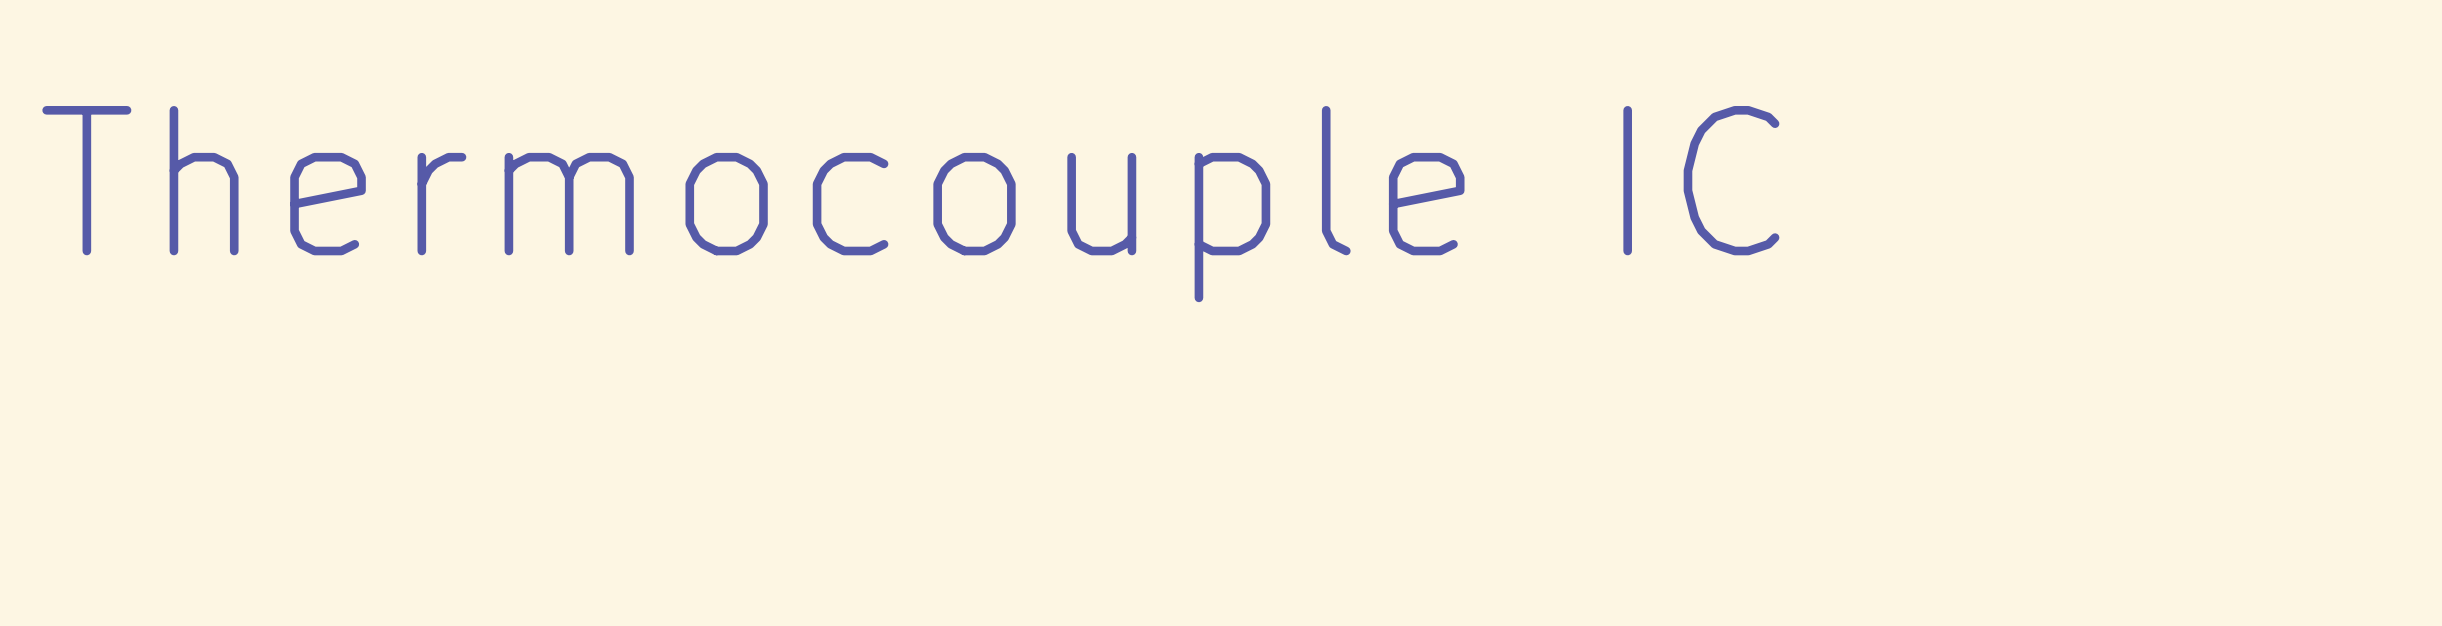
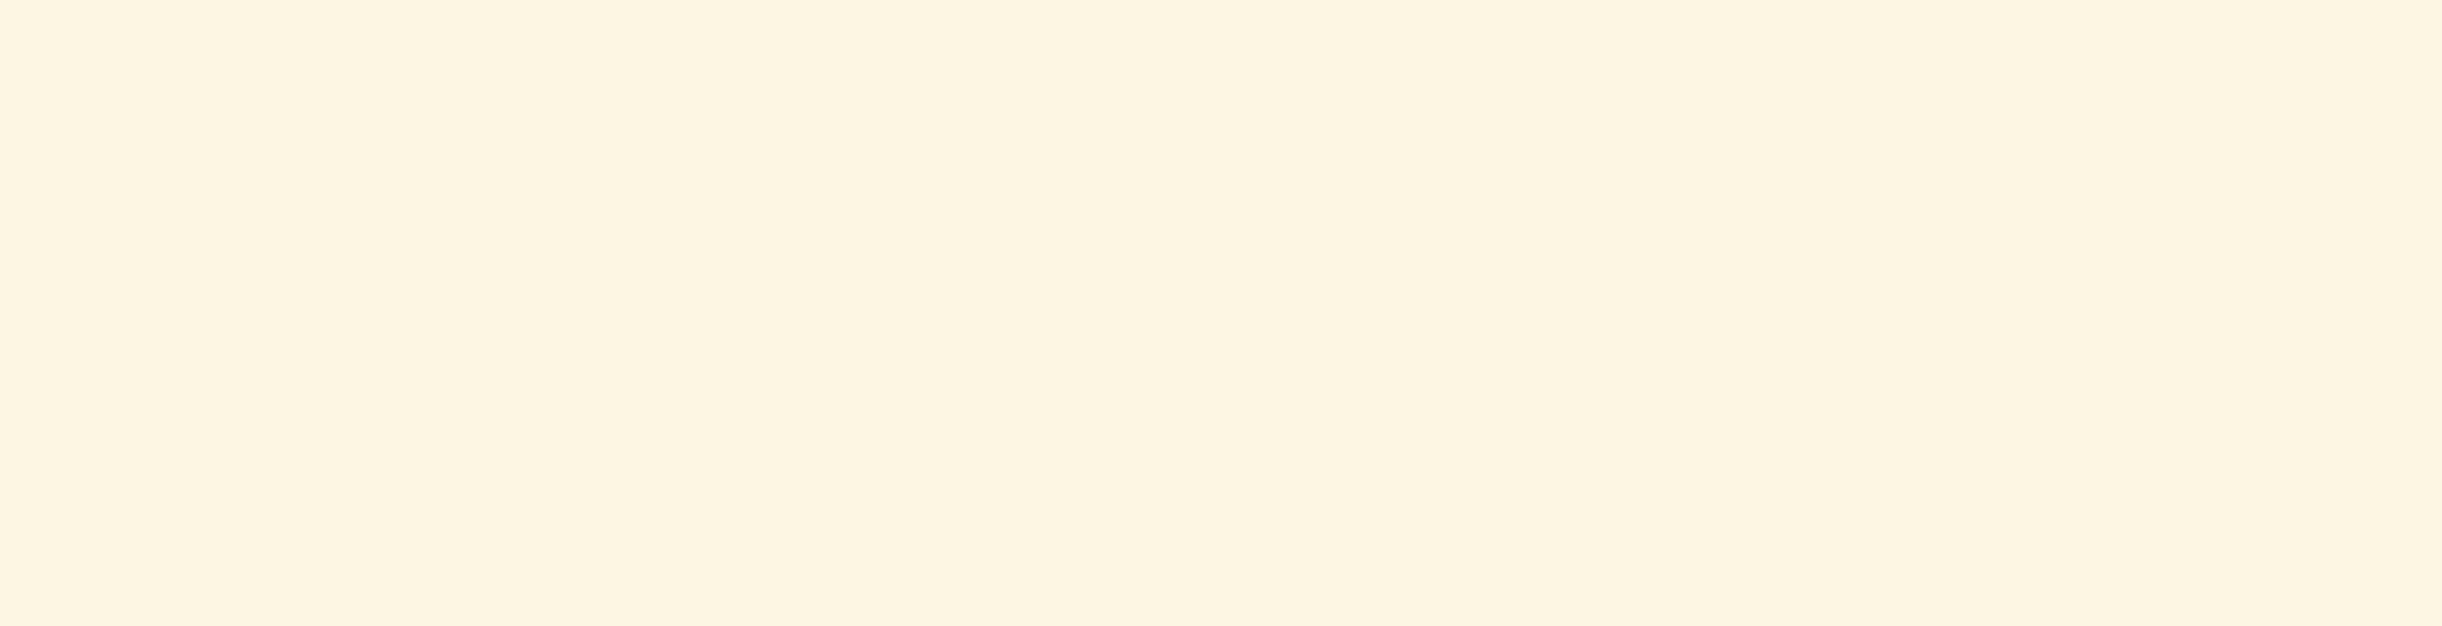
text: Thermocouple IC (910, 204) -> none

